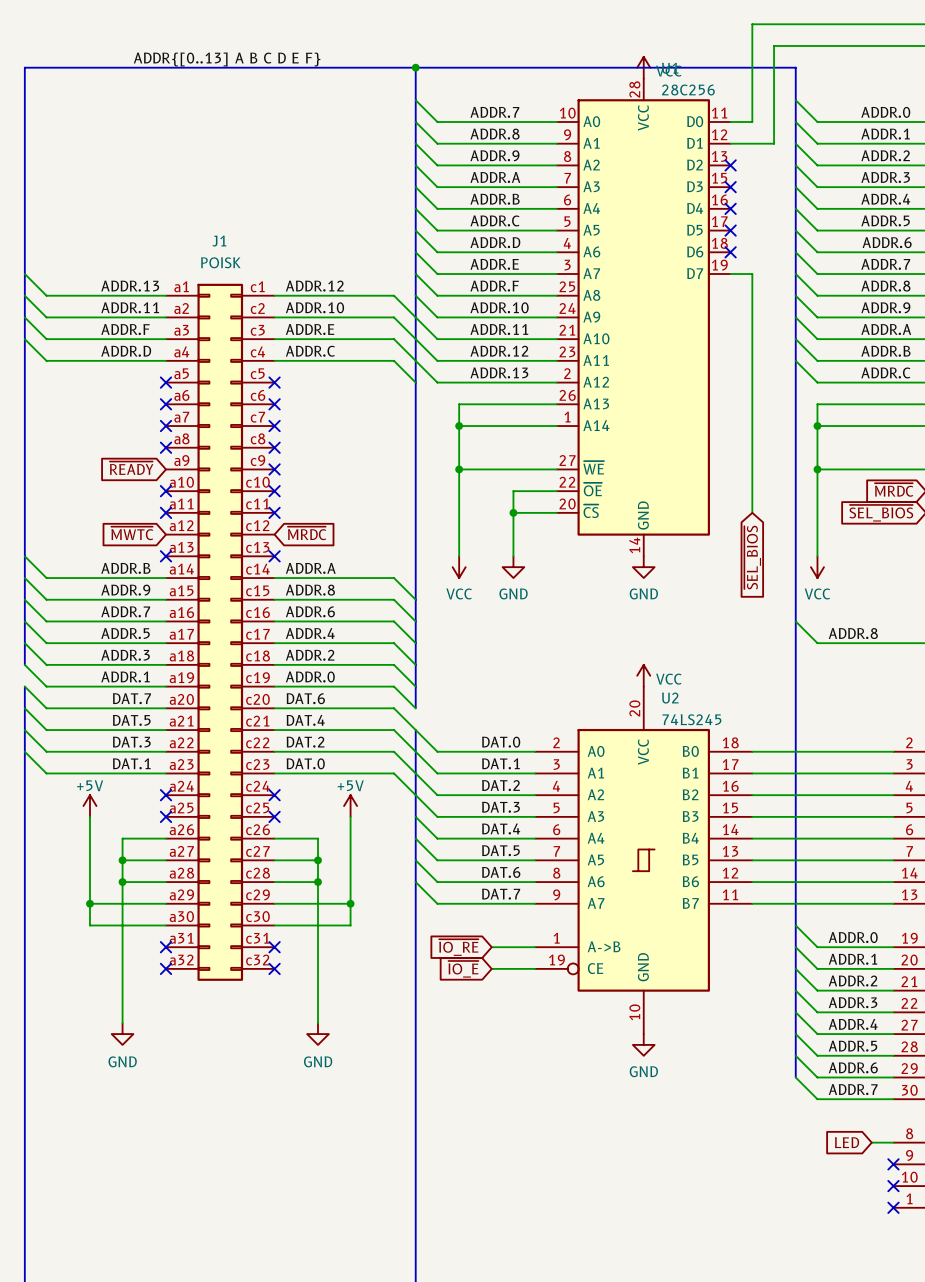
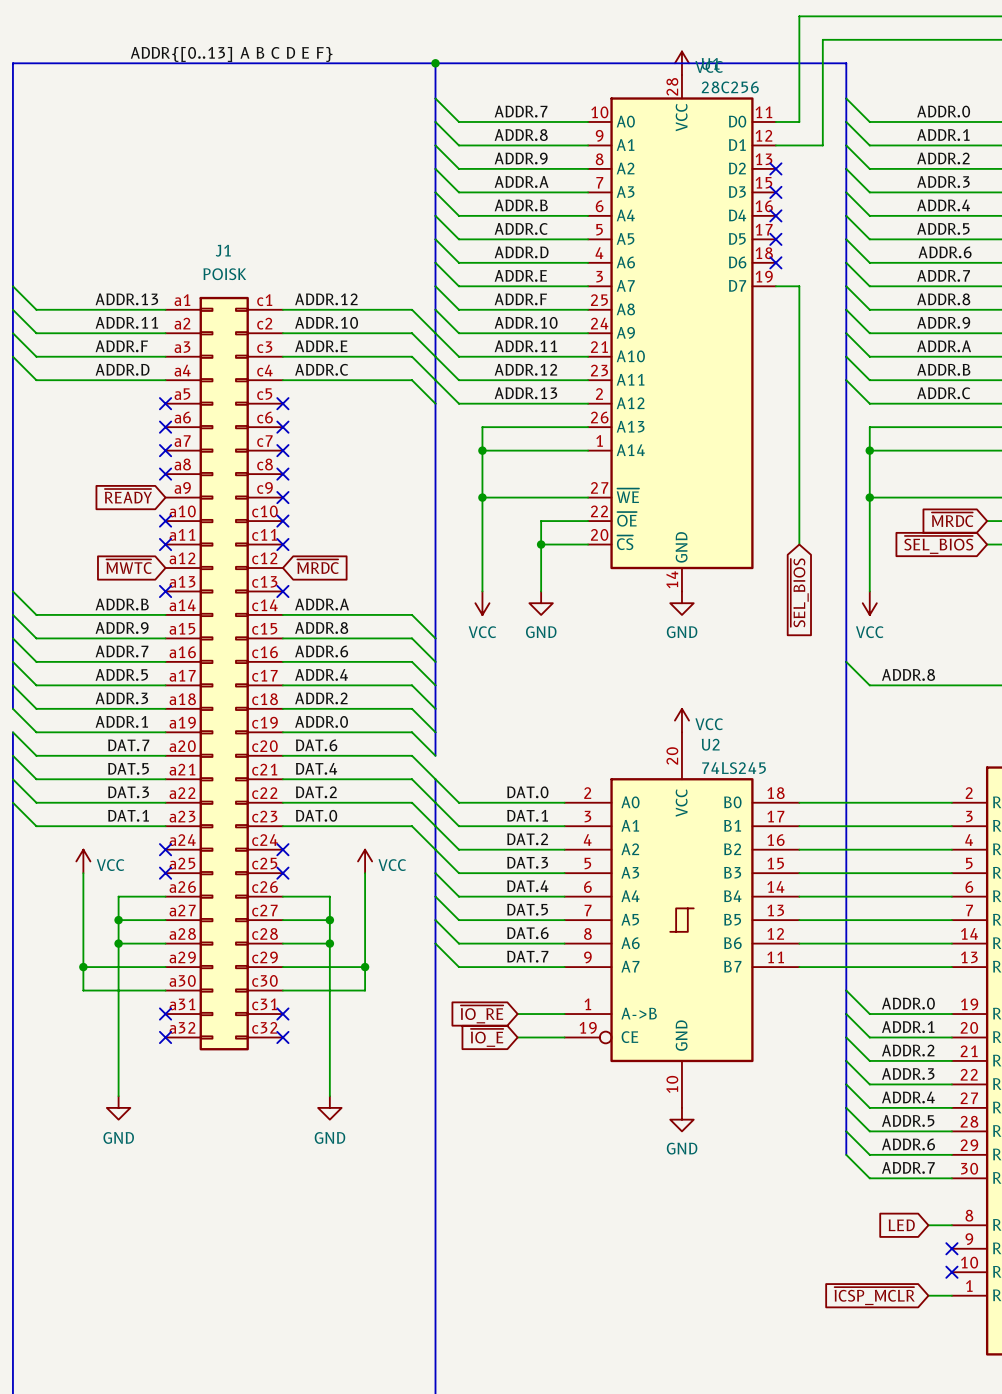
power symbol: +5V (89, 806) -> VCC (83, 861)
power symbol: +5V (350, 806) -> VCC (365, 861)
wire: none -> (928, 1295) (951, 1295)
no-connect mark: (893, 1207) -> none
global label: none -> ~{ICSP_MCLR} (874, 1296)

